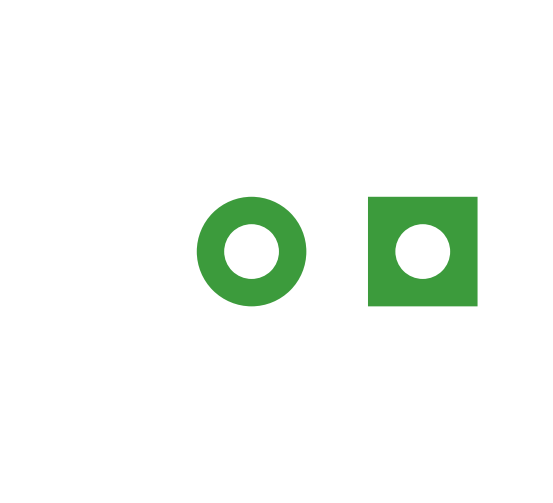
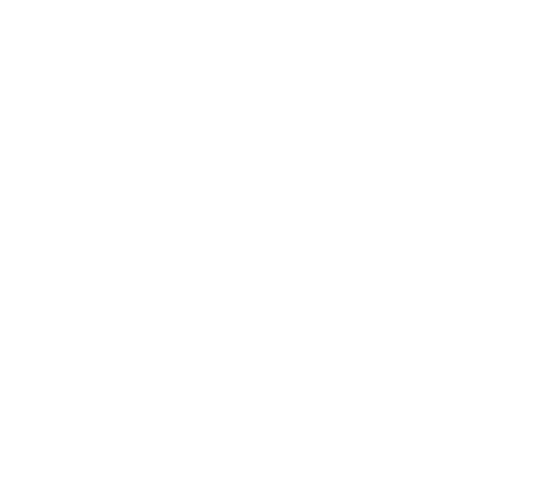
part: (337, 251) -> none

